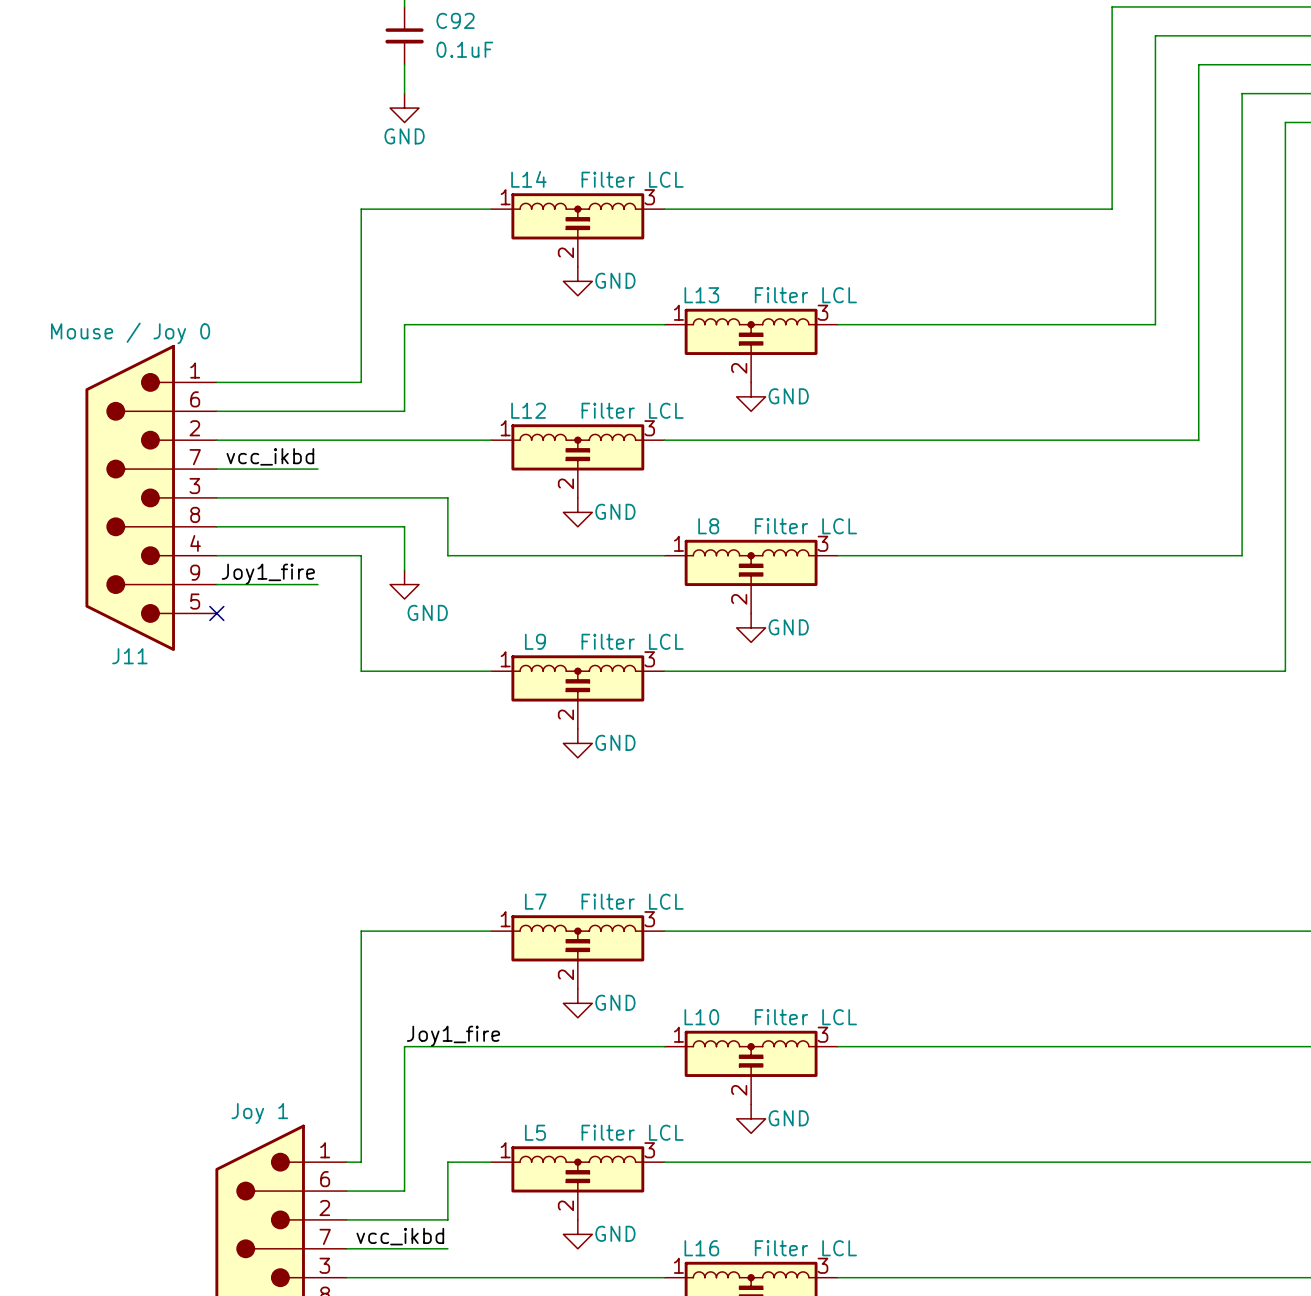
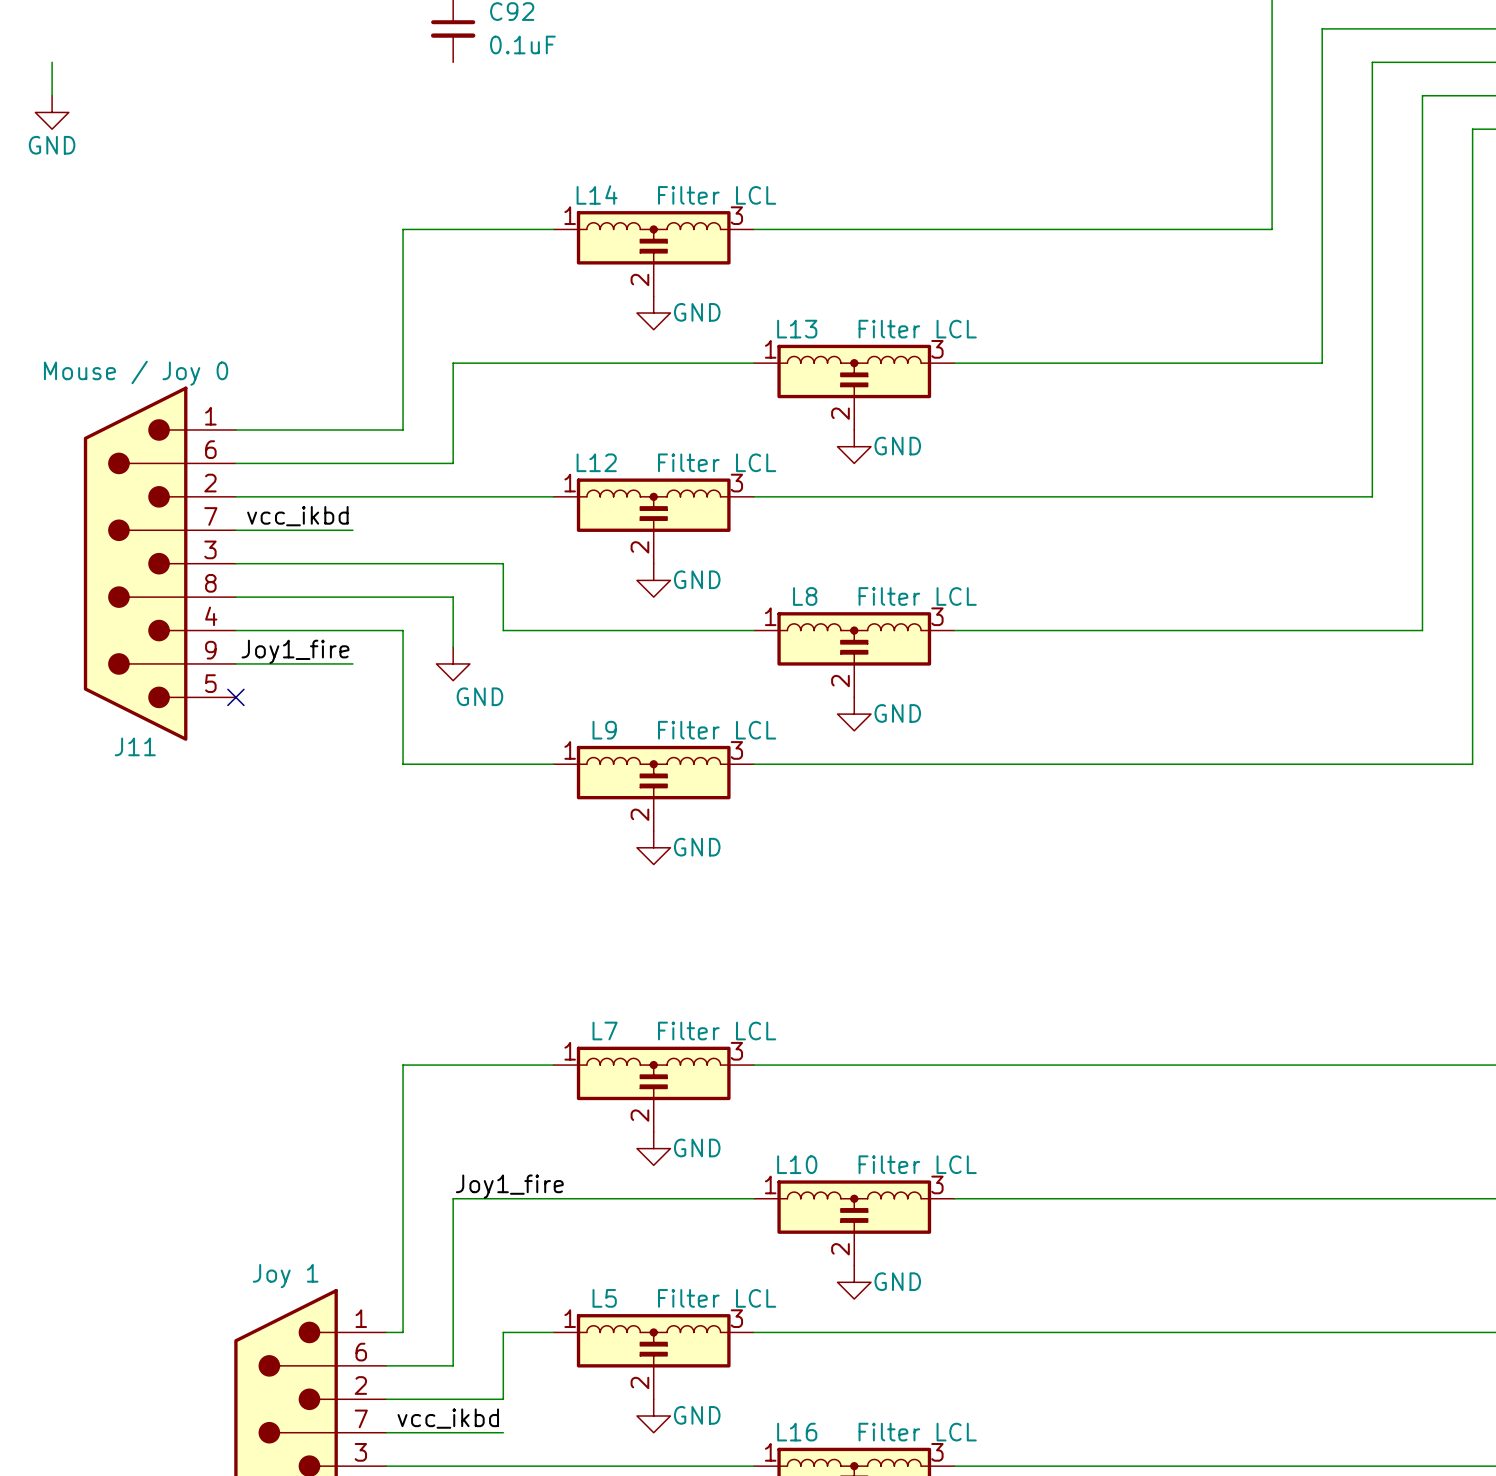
wire: none -> (52, 62) (52, 95)
wire: (404, 64) (404, 93) -> none
power symbol: none -> GND (52, 112)
power symbol: GND (404, 108) -> none

